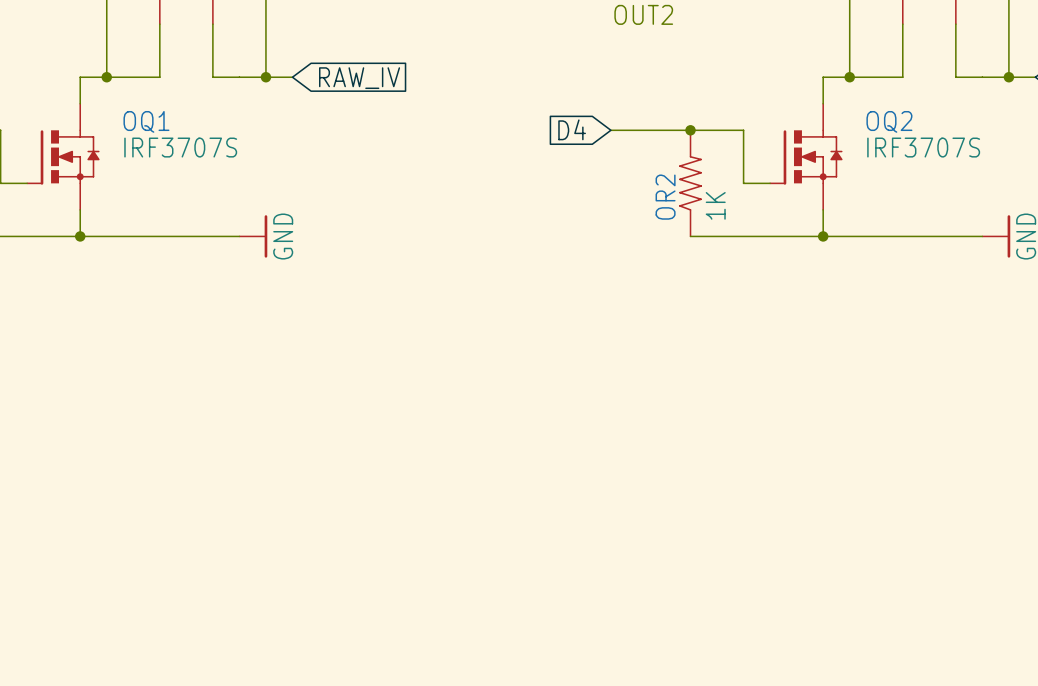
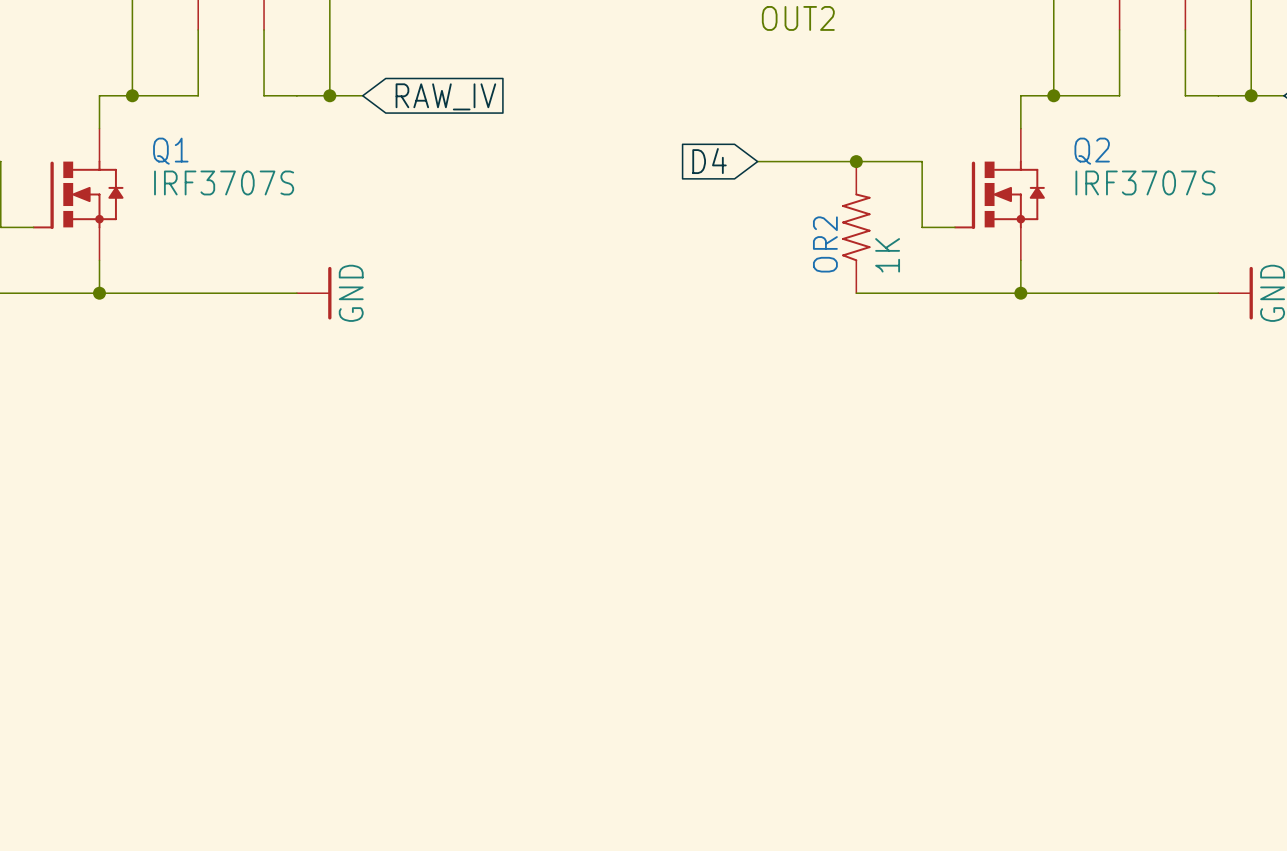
OQ1 name: OQ1 (146, 121) -> Q1 (170, 151)
OQ2 name: OQ2 (889, 121) -> Q2 (1092, 151)

